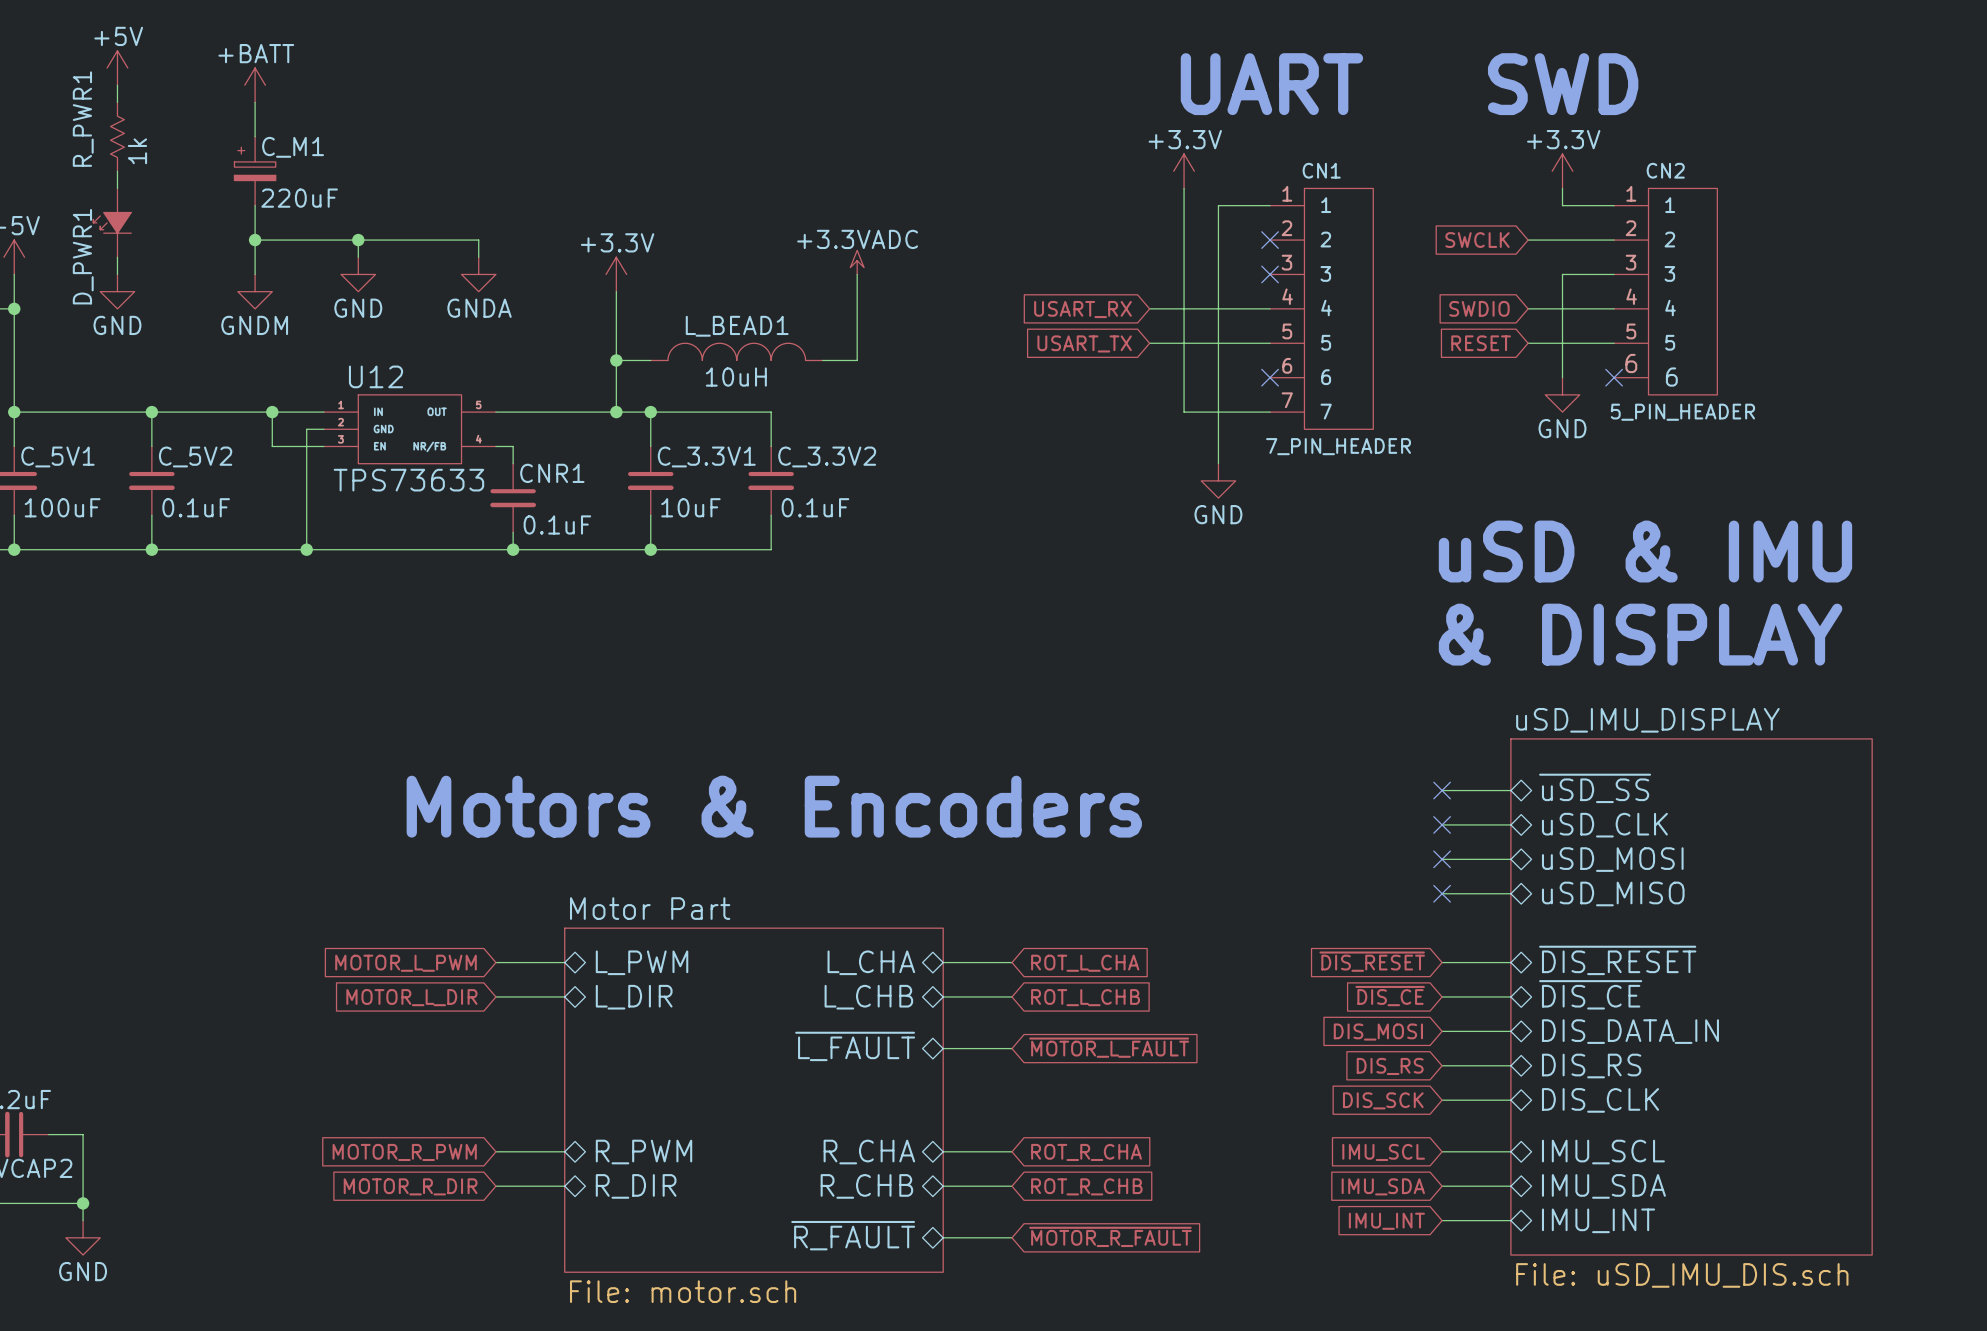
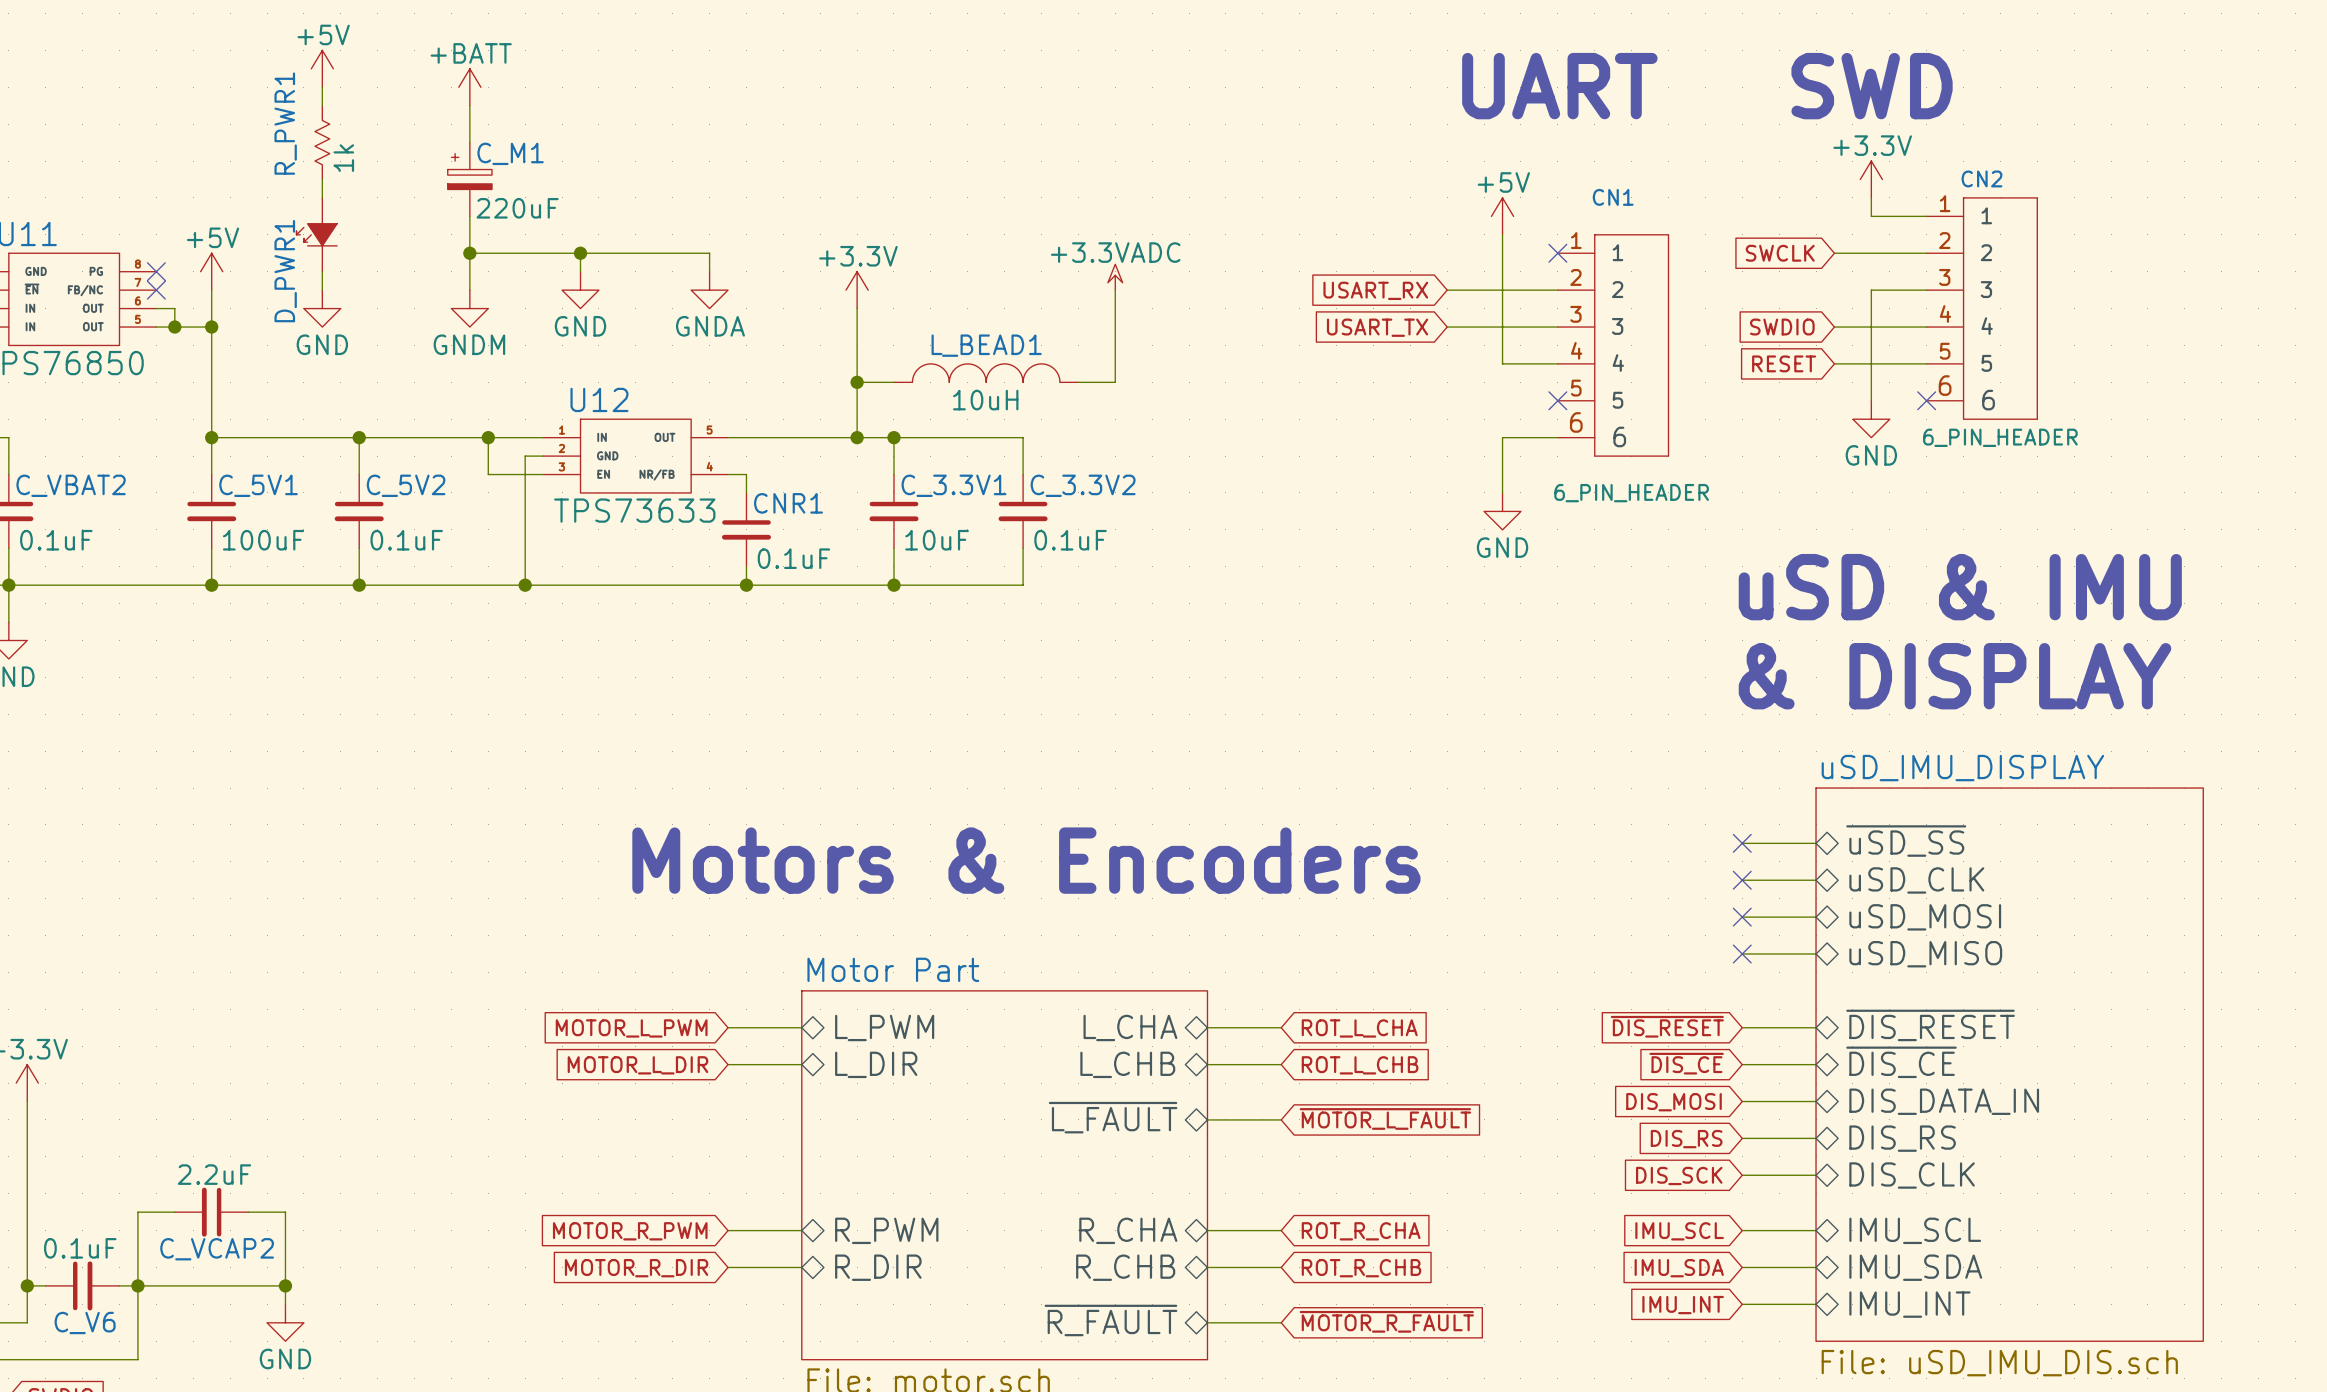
power symbol: +3.3V (1184, 171) -> none
wire: (1184, 188) (1184, 412) (1218, 412) (1218, 343) (1149, 343) -> none
CN1 symbol: [1270, 188, 1374, 430] -> [1557, 234, 1669, 457]
power symbol: none -> +5V (1502, 216)
wire: (1270, 205) (1218, 205) (1218, 222) -> none
wire: none -> (1447, 290) (1557, 290)
no-connect mark: (1270, 274) -> none
wire: (1149, 308) (1166, 308) -> none
global label position: USART_RX (1082, 309) -> USART_RX (1375, 290)
global label position: USART_TX (1084, 343) -> USART_TX (1377, 327)
CN2 value: 5_PIN_HEADER (1682, 412) -> 6_PIN_HEADER (2000, 437)
CN1 value: 7_PIN_HEADER (1338, 446) -> 6_PIN_HEADER (1631, 493)

